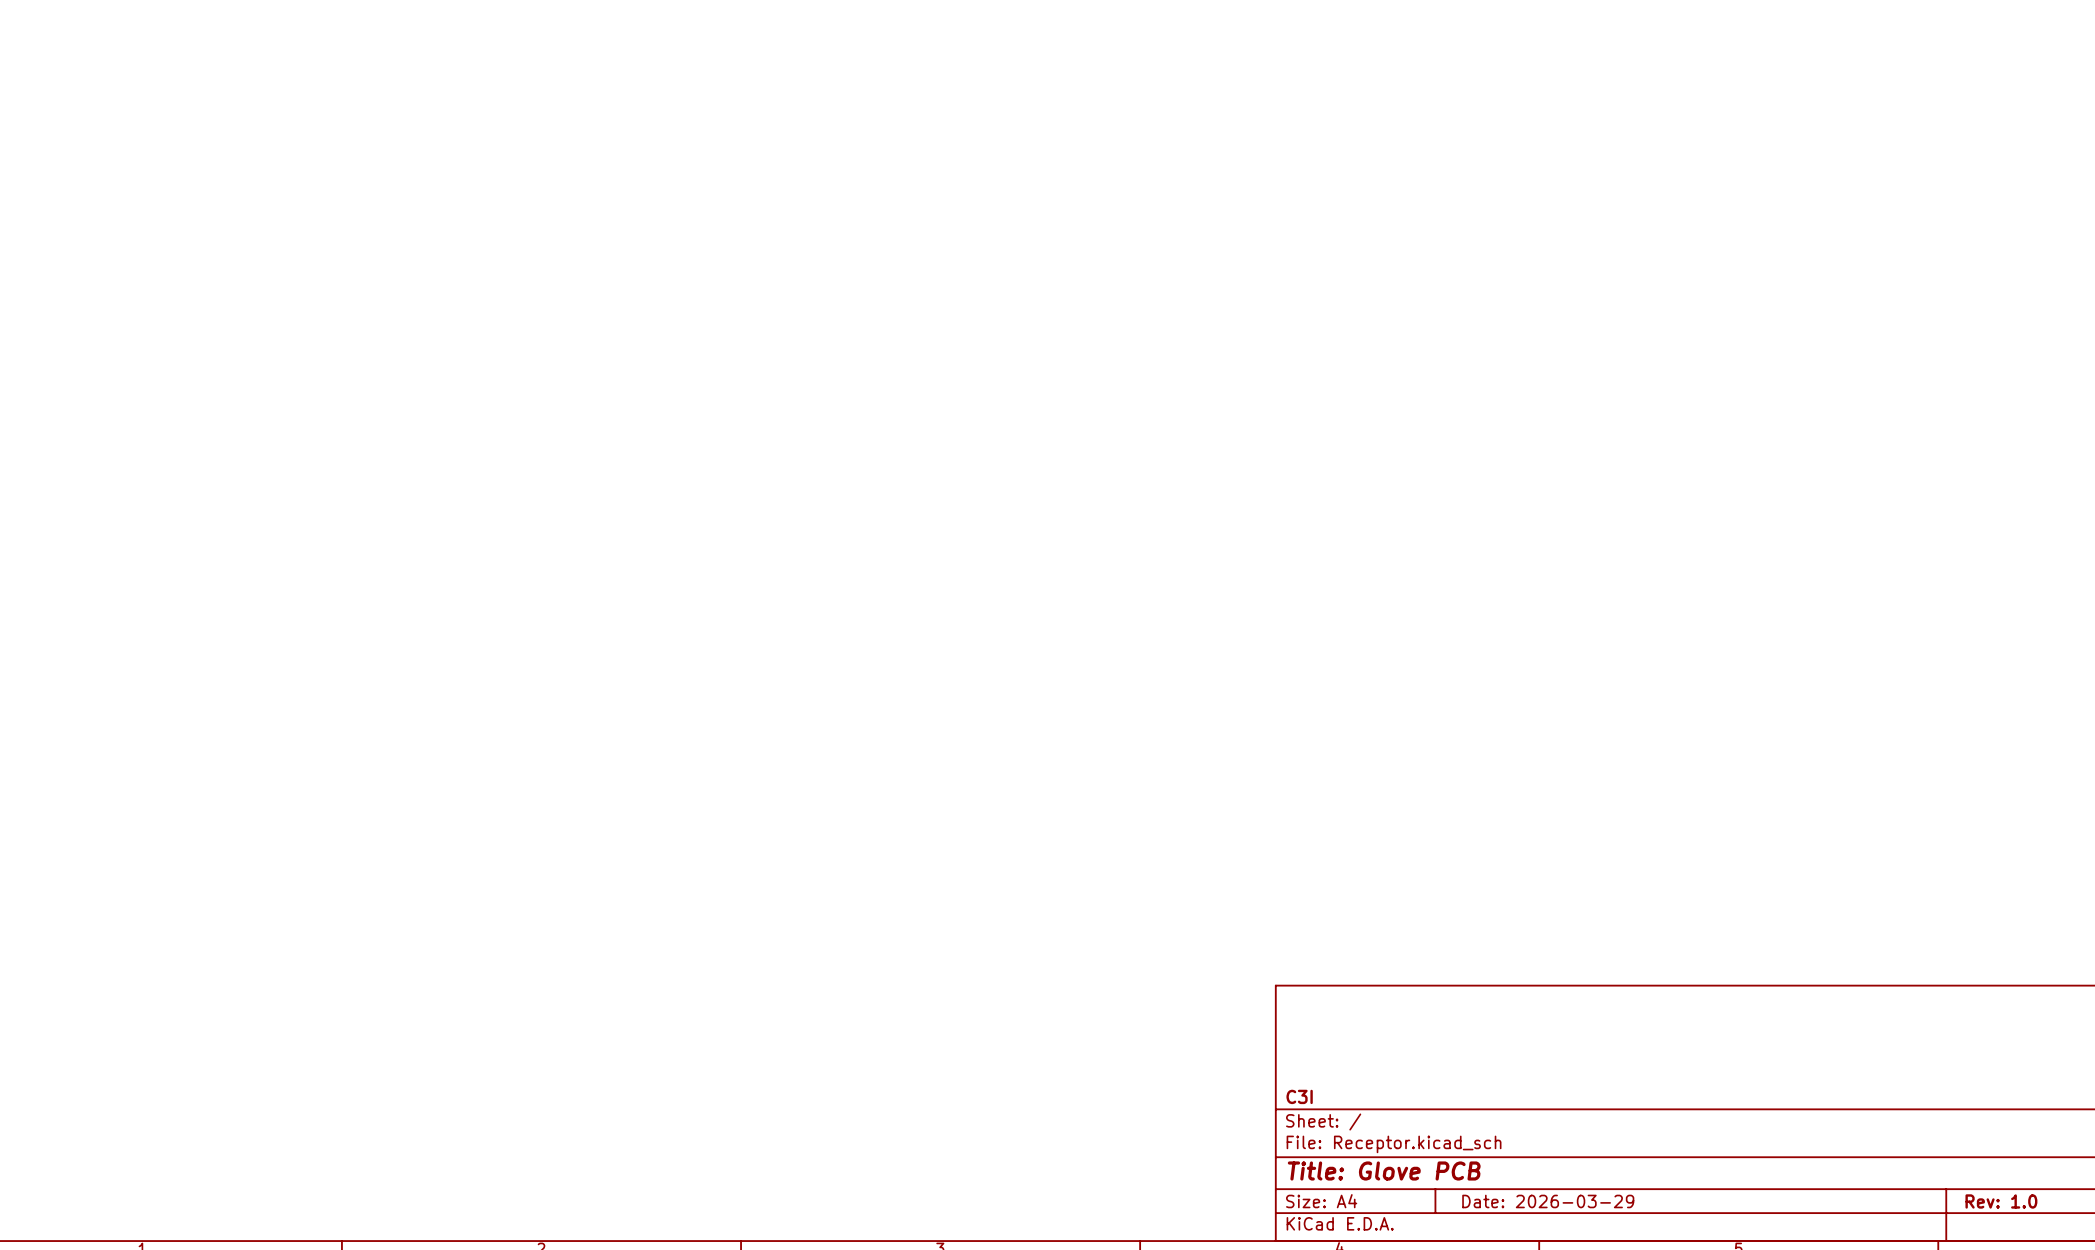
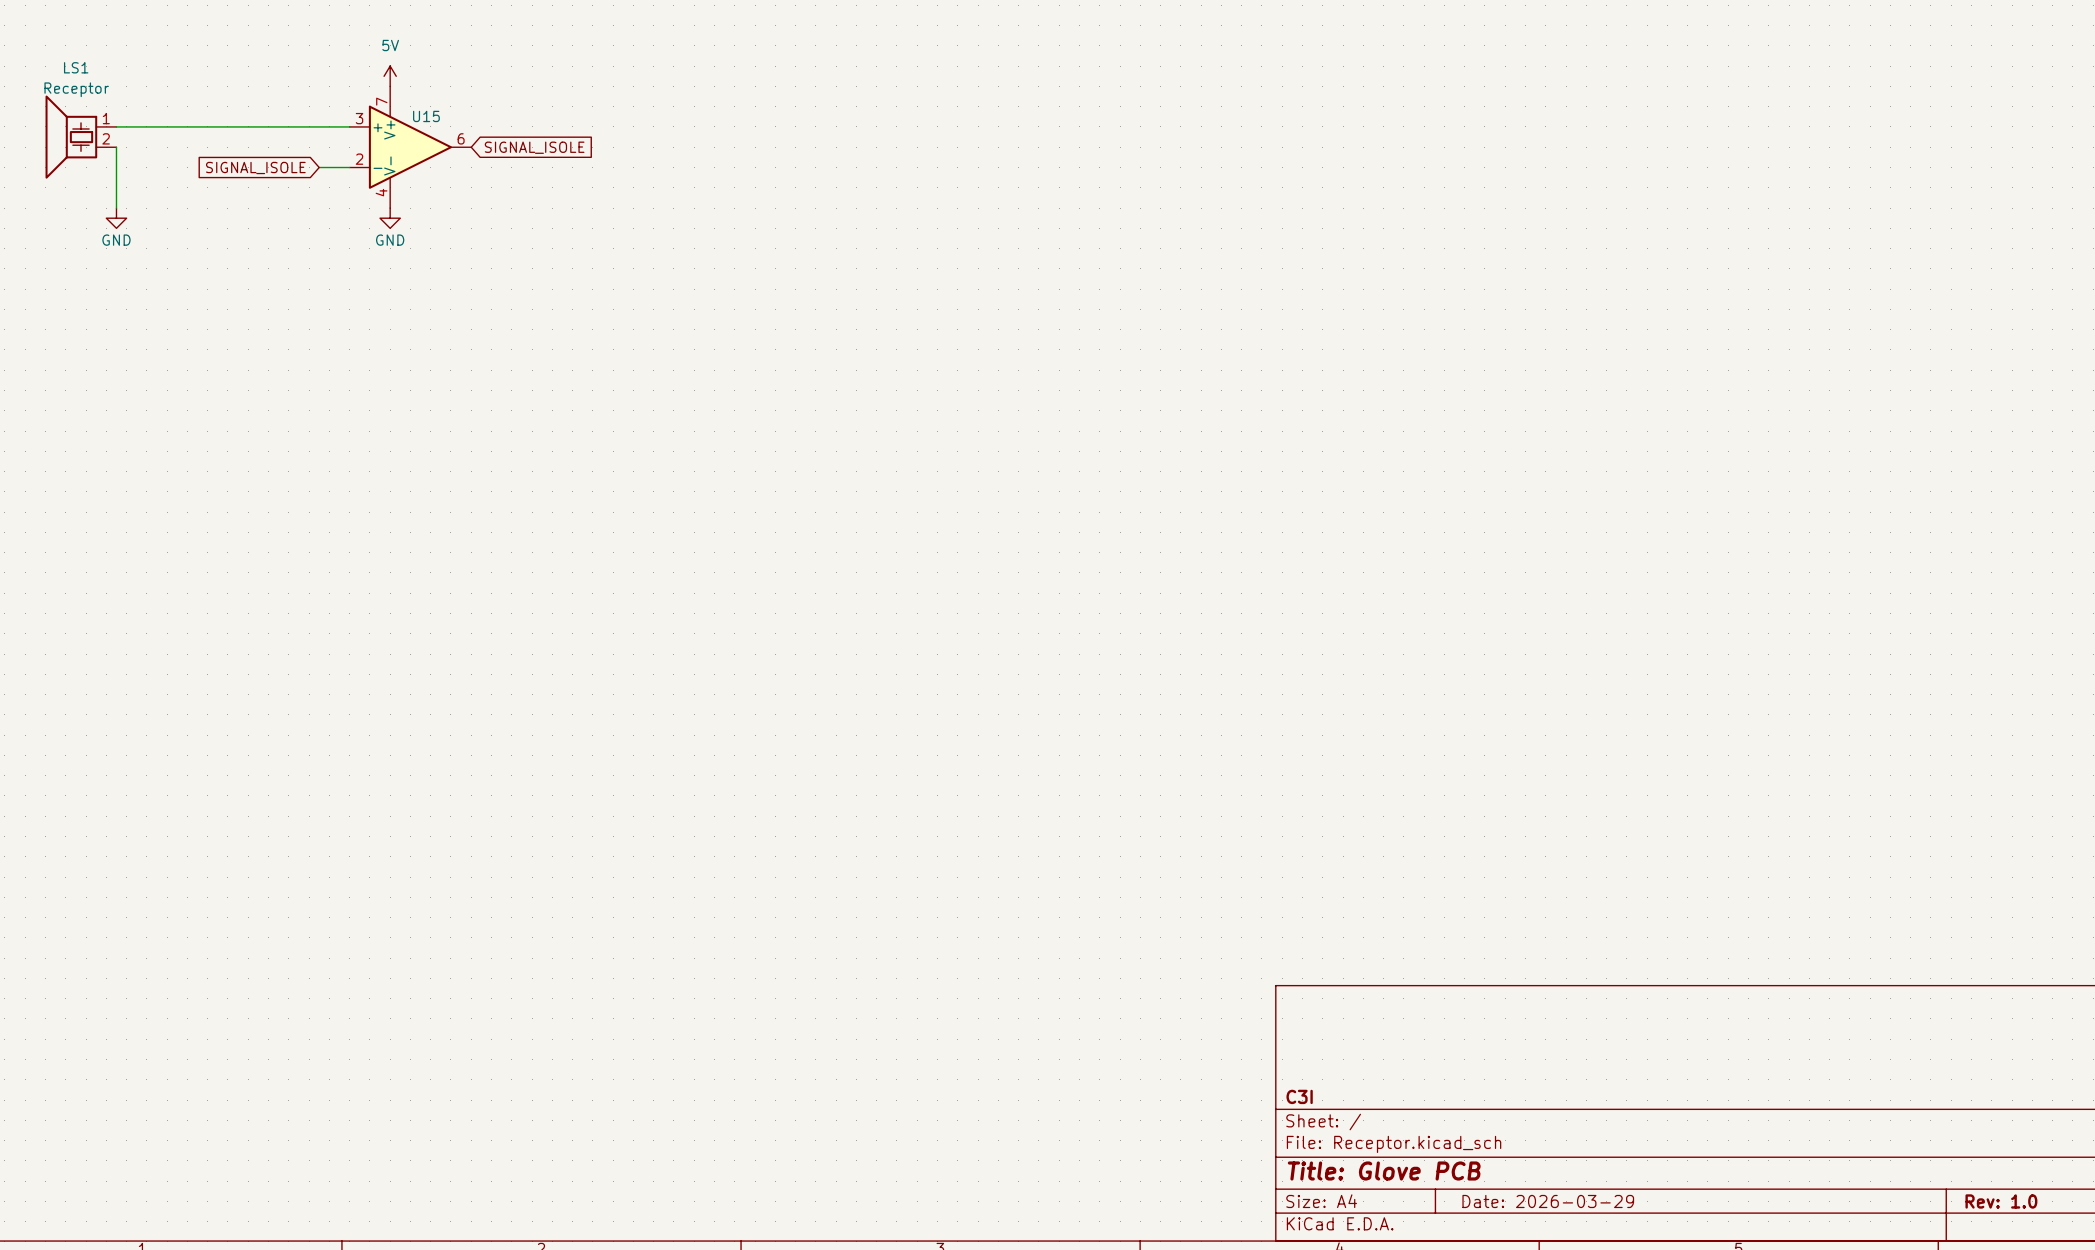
power symbol: none -> 5V (390, 76)
wire: none -> (116, 126) (349, 126)
LS1: none -> Receptor (81, 137)
wire: none -> (116, 147) (116, 208)
U15: none -> (410, 147)
global label: none -> SIGNAL_ISOLE (534, 147)
global label: none -> SIGNAL_ISOLE (255, 167)
wire: none -> (319, 167) (349, 167)
power symbol: none -> GND (116, 218)
power symbol: none -> GND (390, 218)

